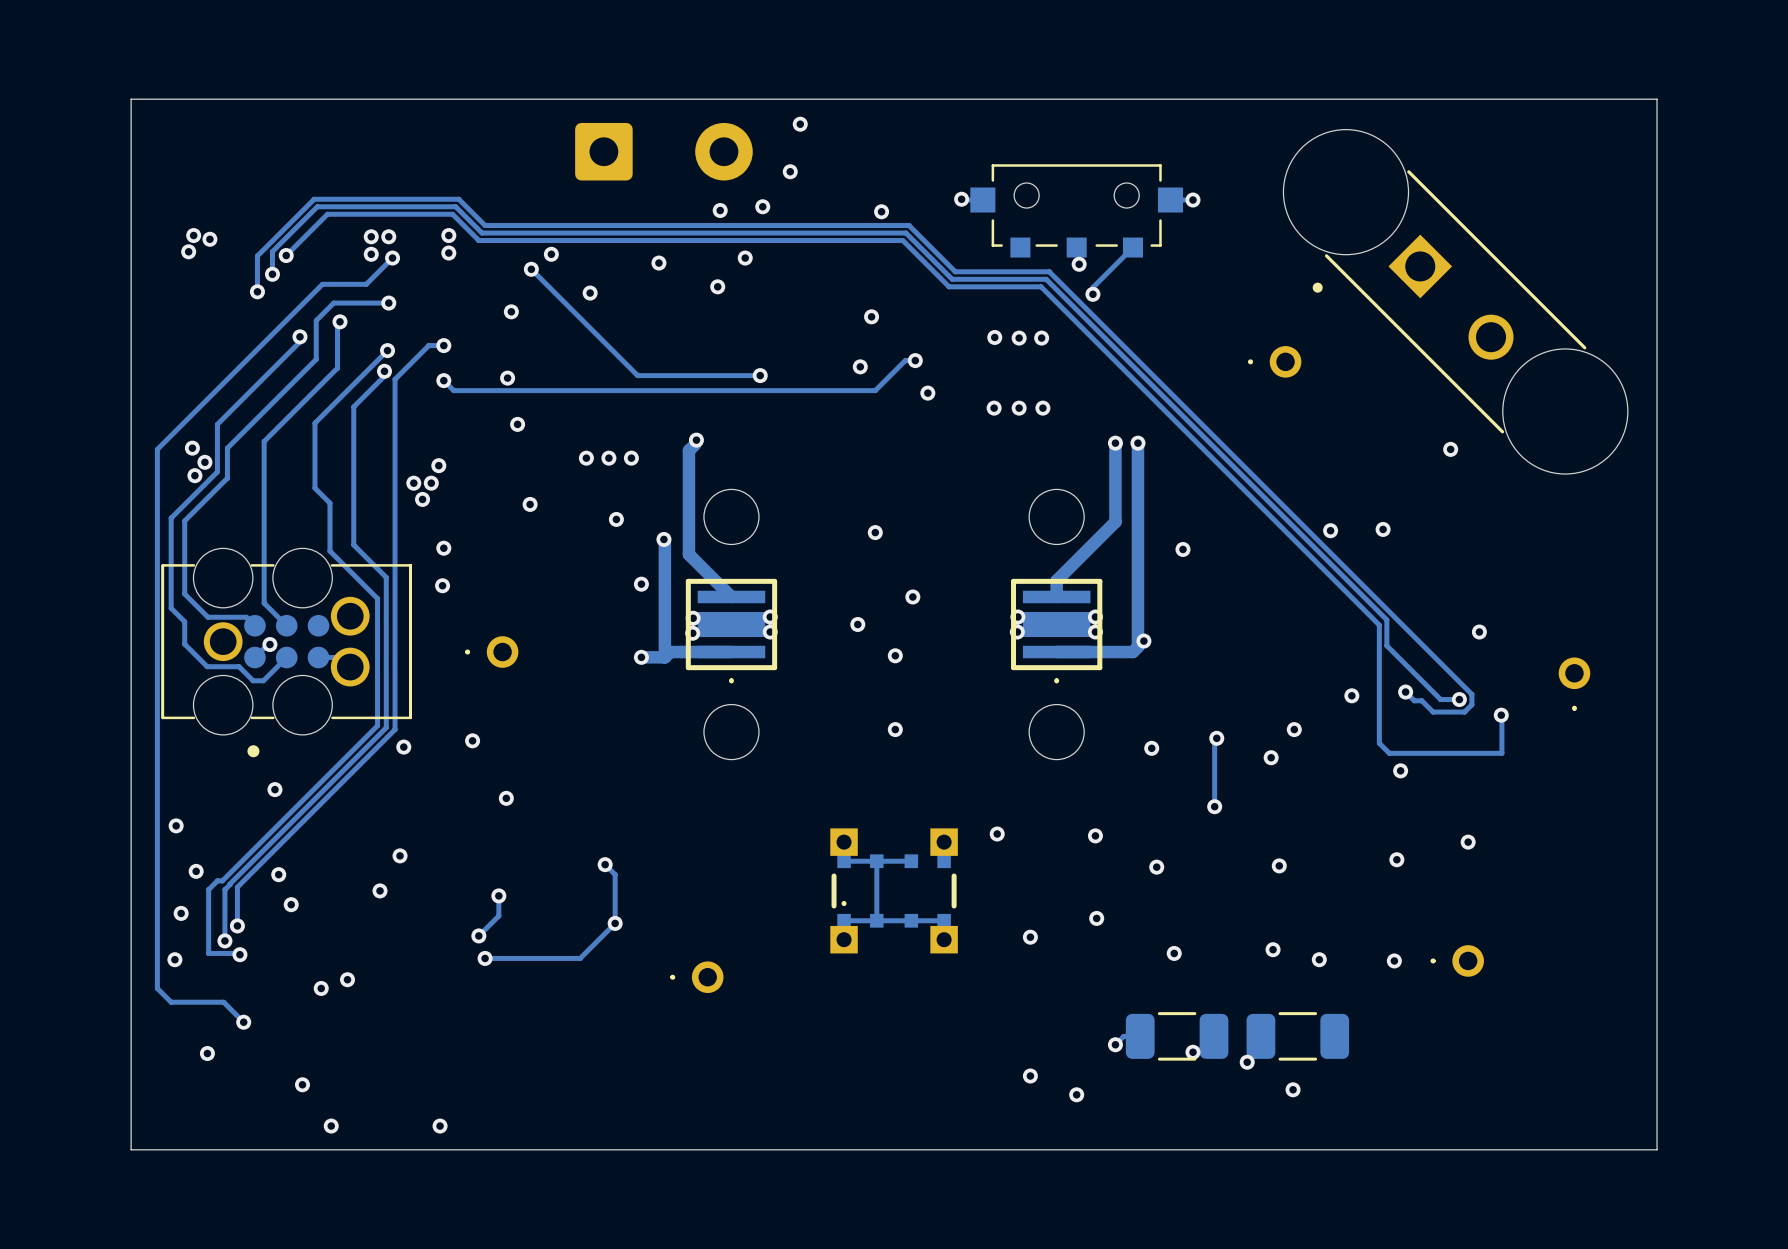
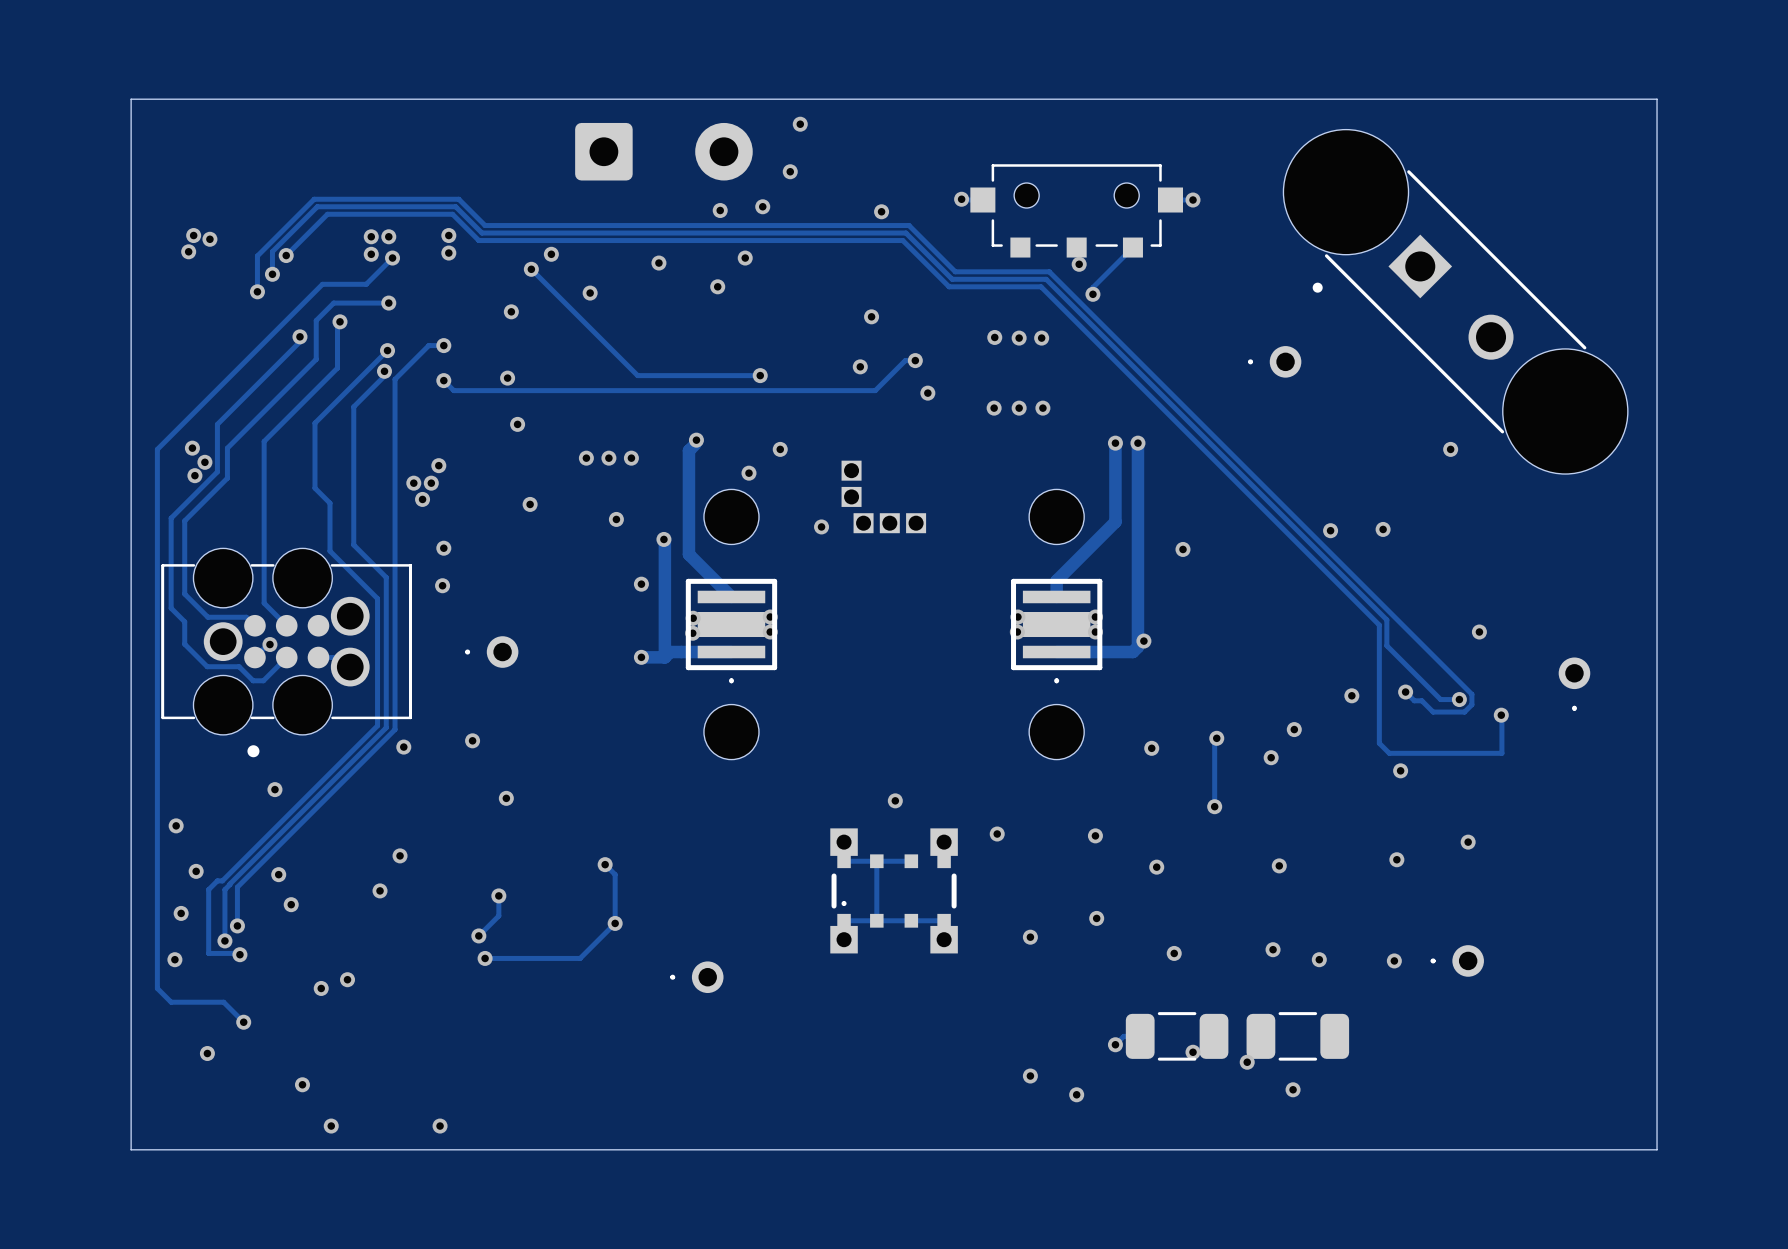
via: none -> (780, 449)
via: none -> (748, 473)
part: none -> (883, 496)
via: none -> (821, 526)
via: (875, 532) -> none
via: (912, 596) -> none
via: (857, 624) -> none
via: (895, 655) -> none
via position: (895, 729) -> (895, 800)

